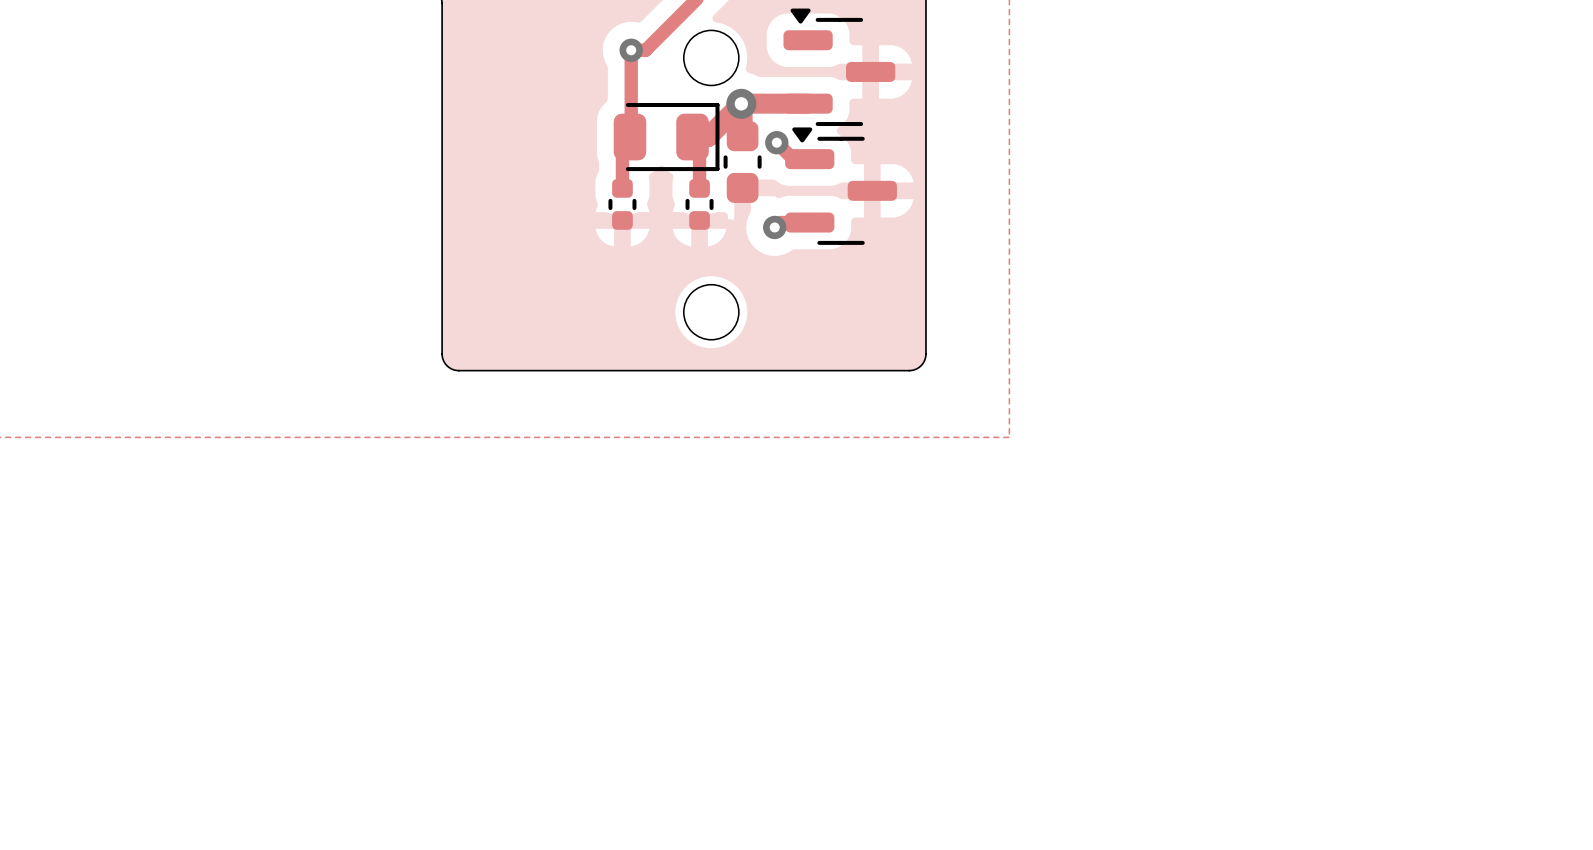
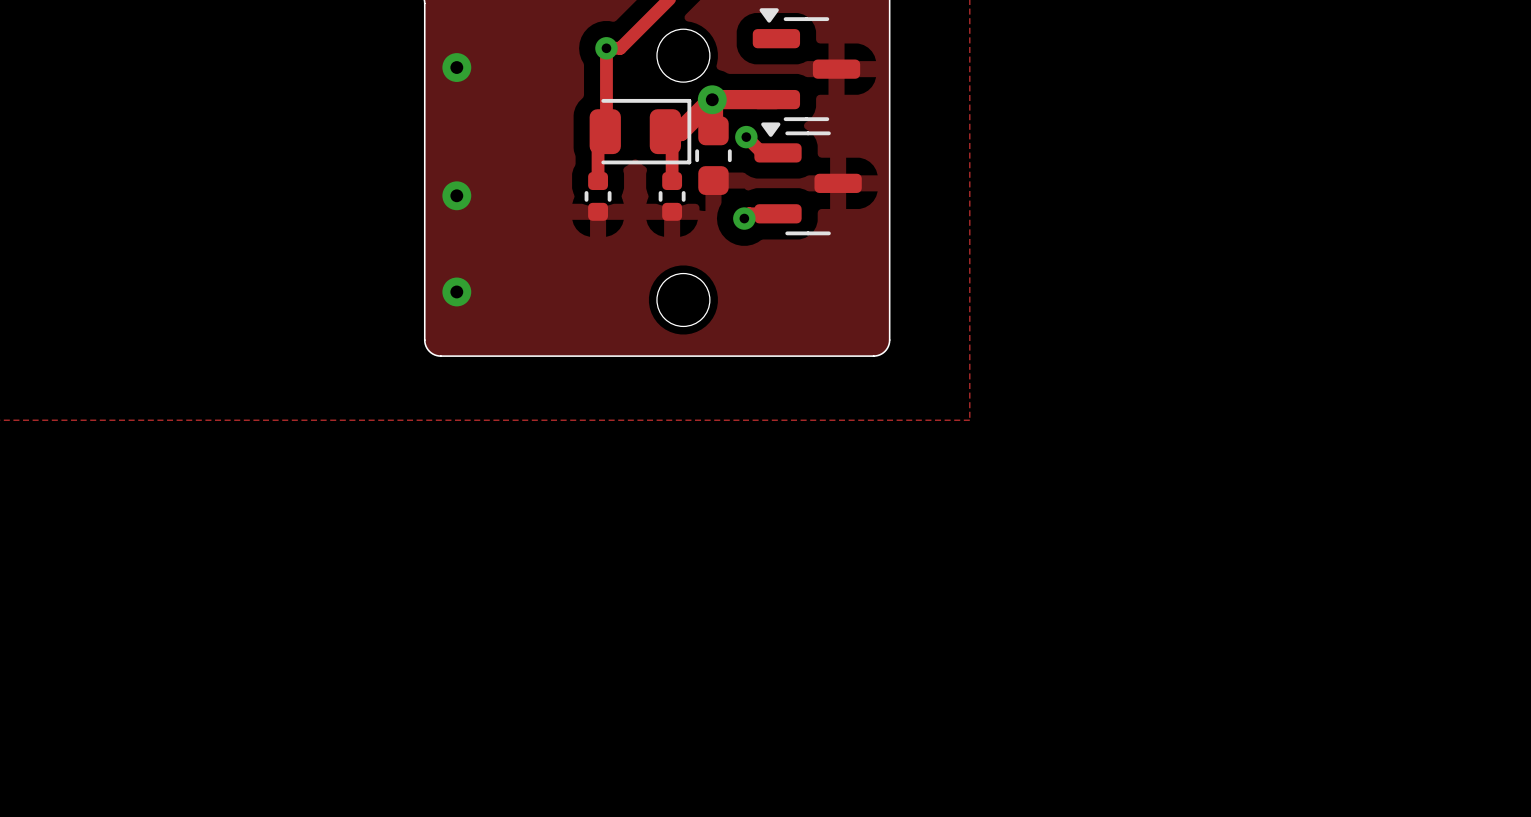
via: none -> (456, 67)
via: none -> (456, 195)
via: none -> (456, 291)

